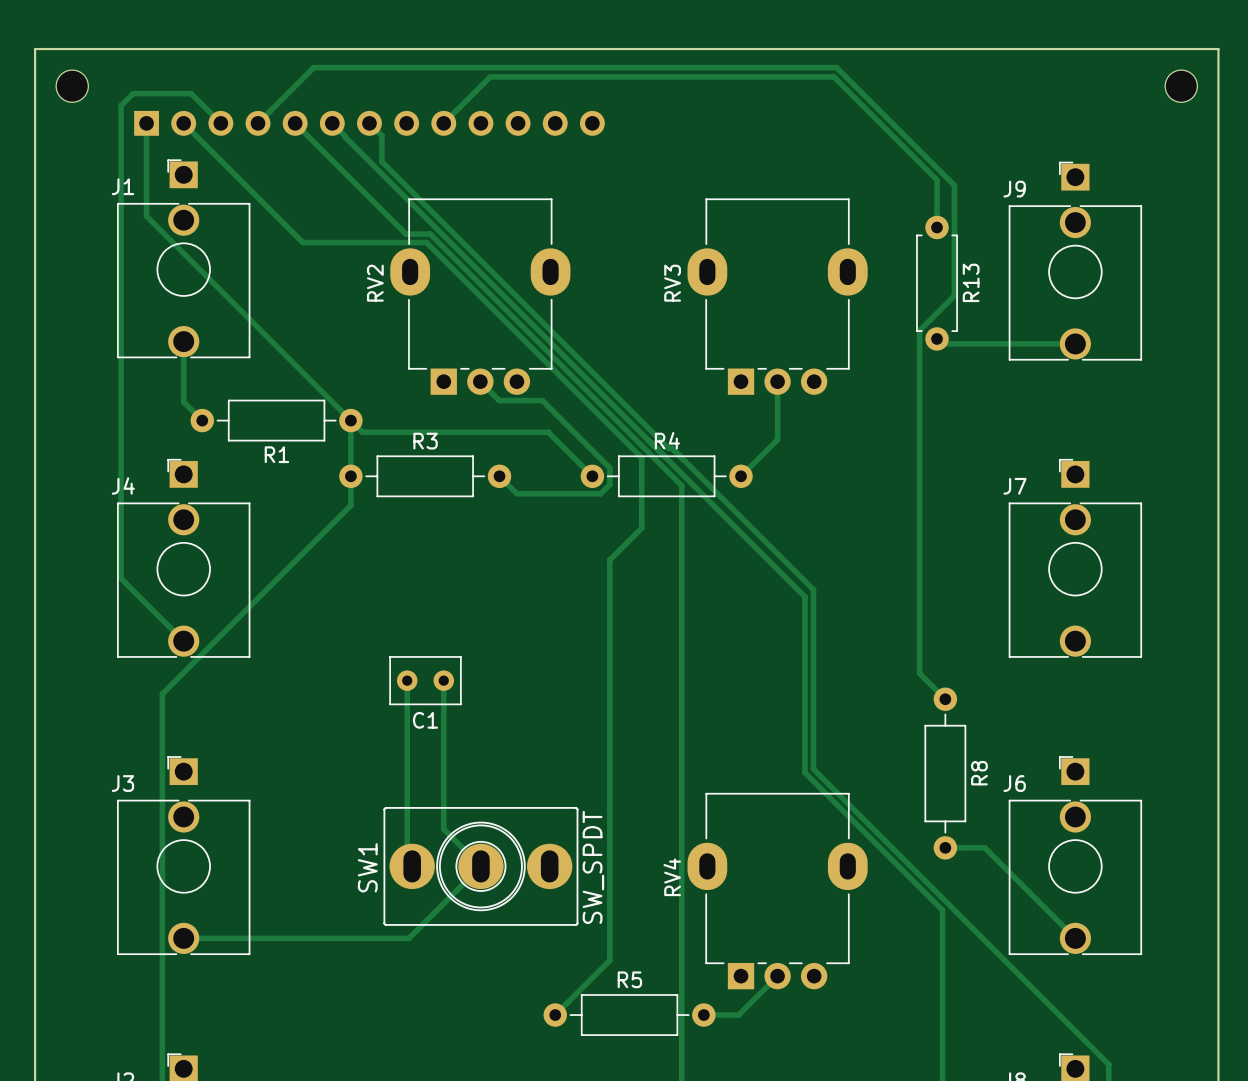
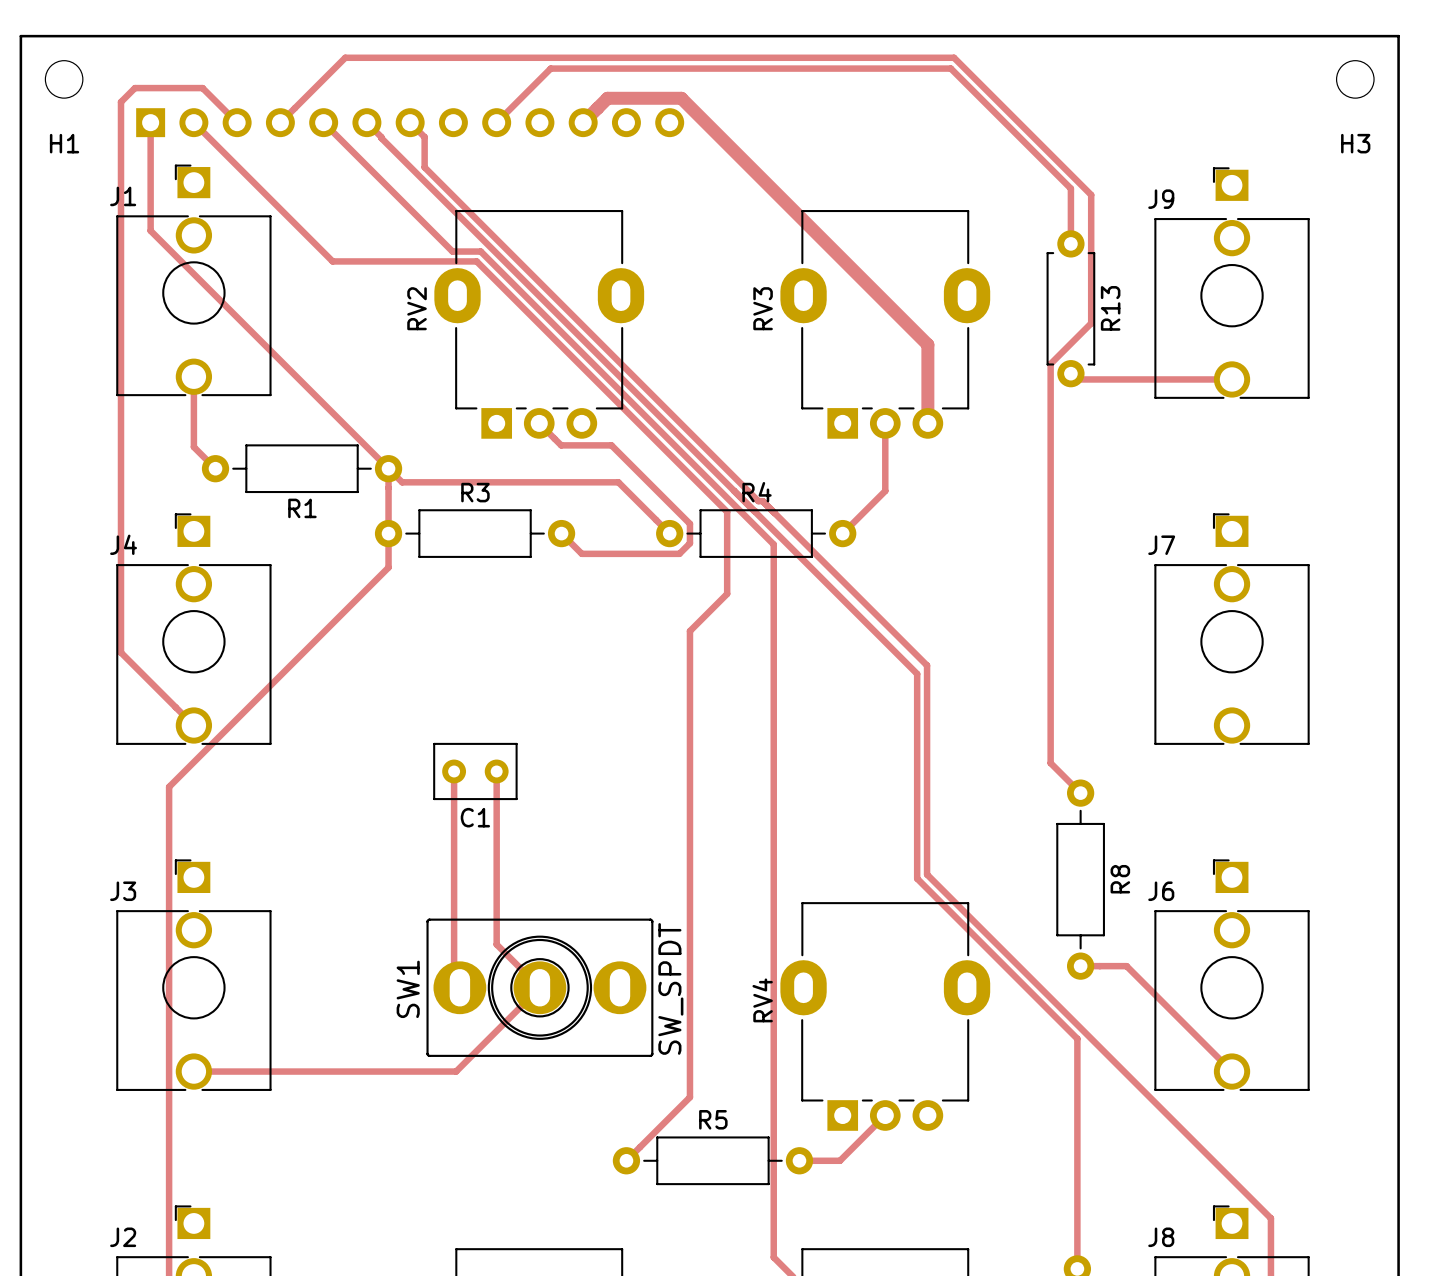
track: none -> (583, 122) (607, 98) (681, 98) (927, 344) (927, 423)
H1 name: none -> H1 (64, 143)
H3 name: none -> H3 (1355, 143)

